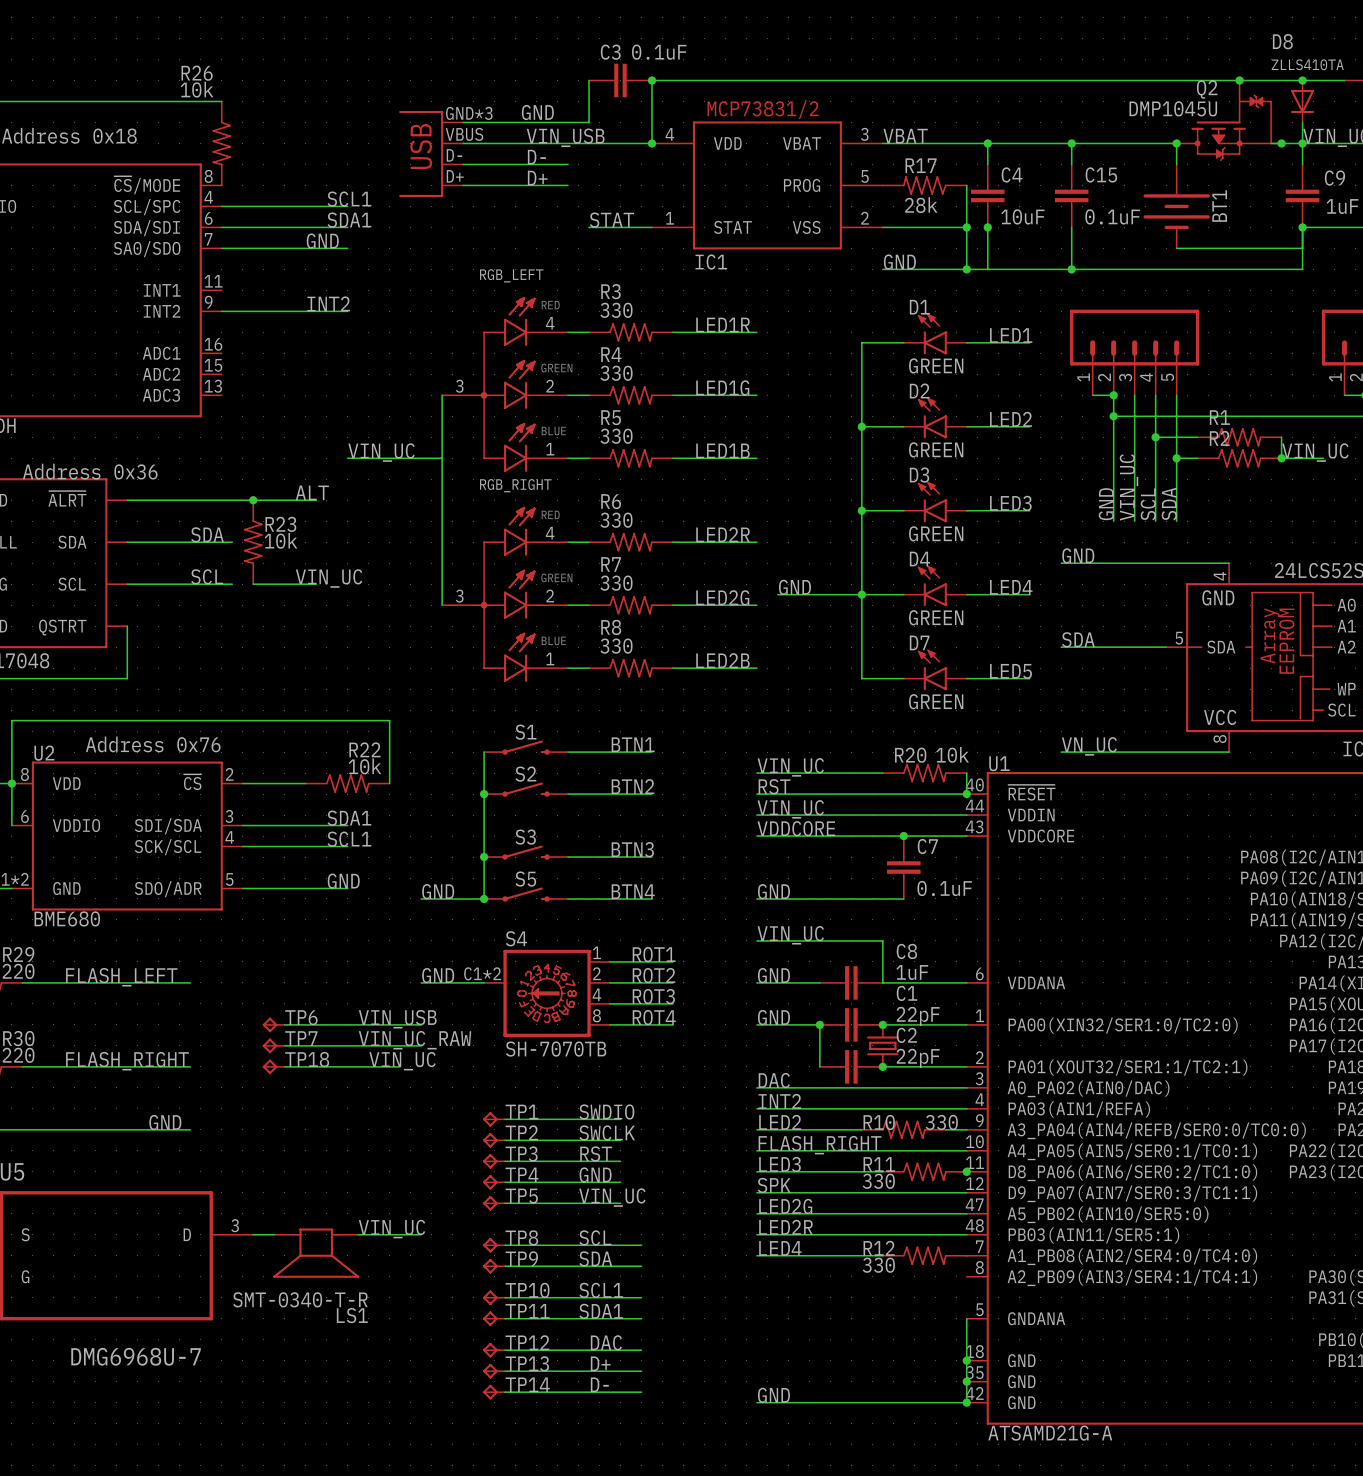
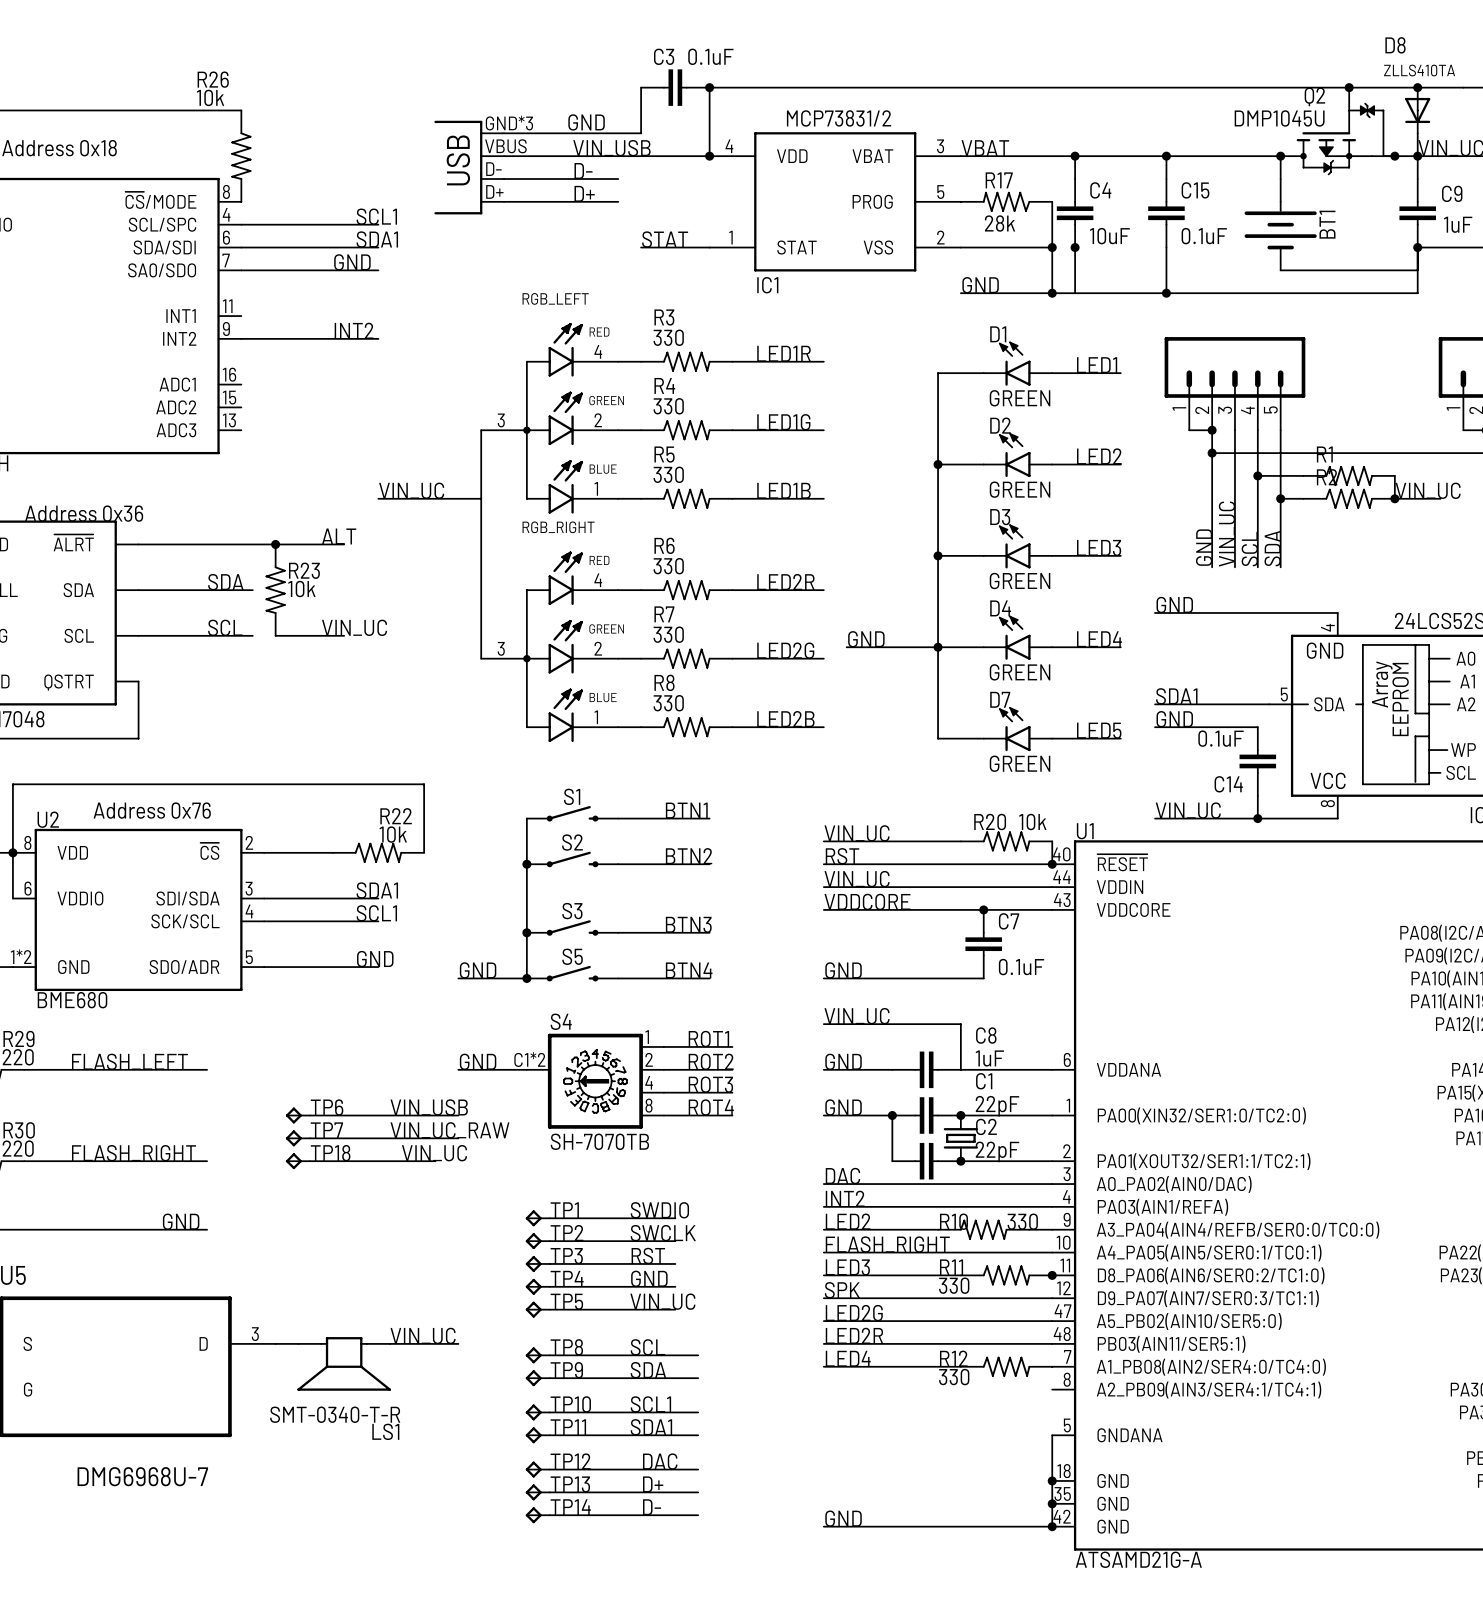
label: SDA (1078, 639) -> SDA1 (1176, 696)
label: none -> GND (1174, 719)
wire: none -> (1155, 727) (1257, 727)
C14: none -> 0.1uF (1257, 761)
wire: none -> (1257, 795) (1257, 818)
label: VN_UC (1089, 746) -> VIN_UC (1188, 810)
junction: none -> (1257, 818)

